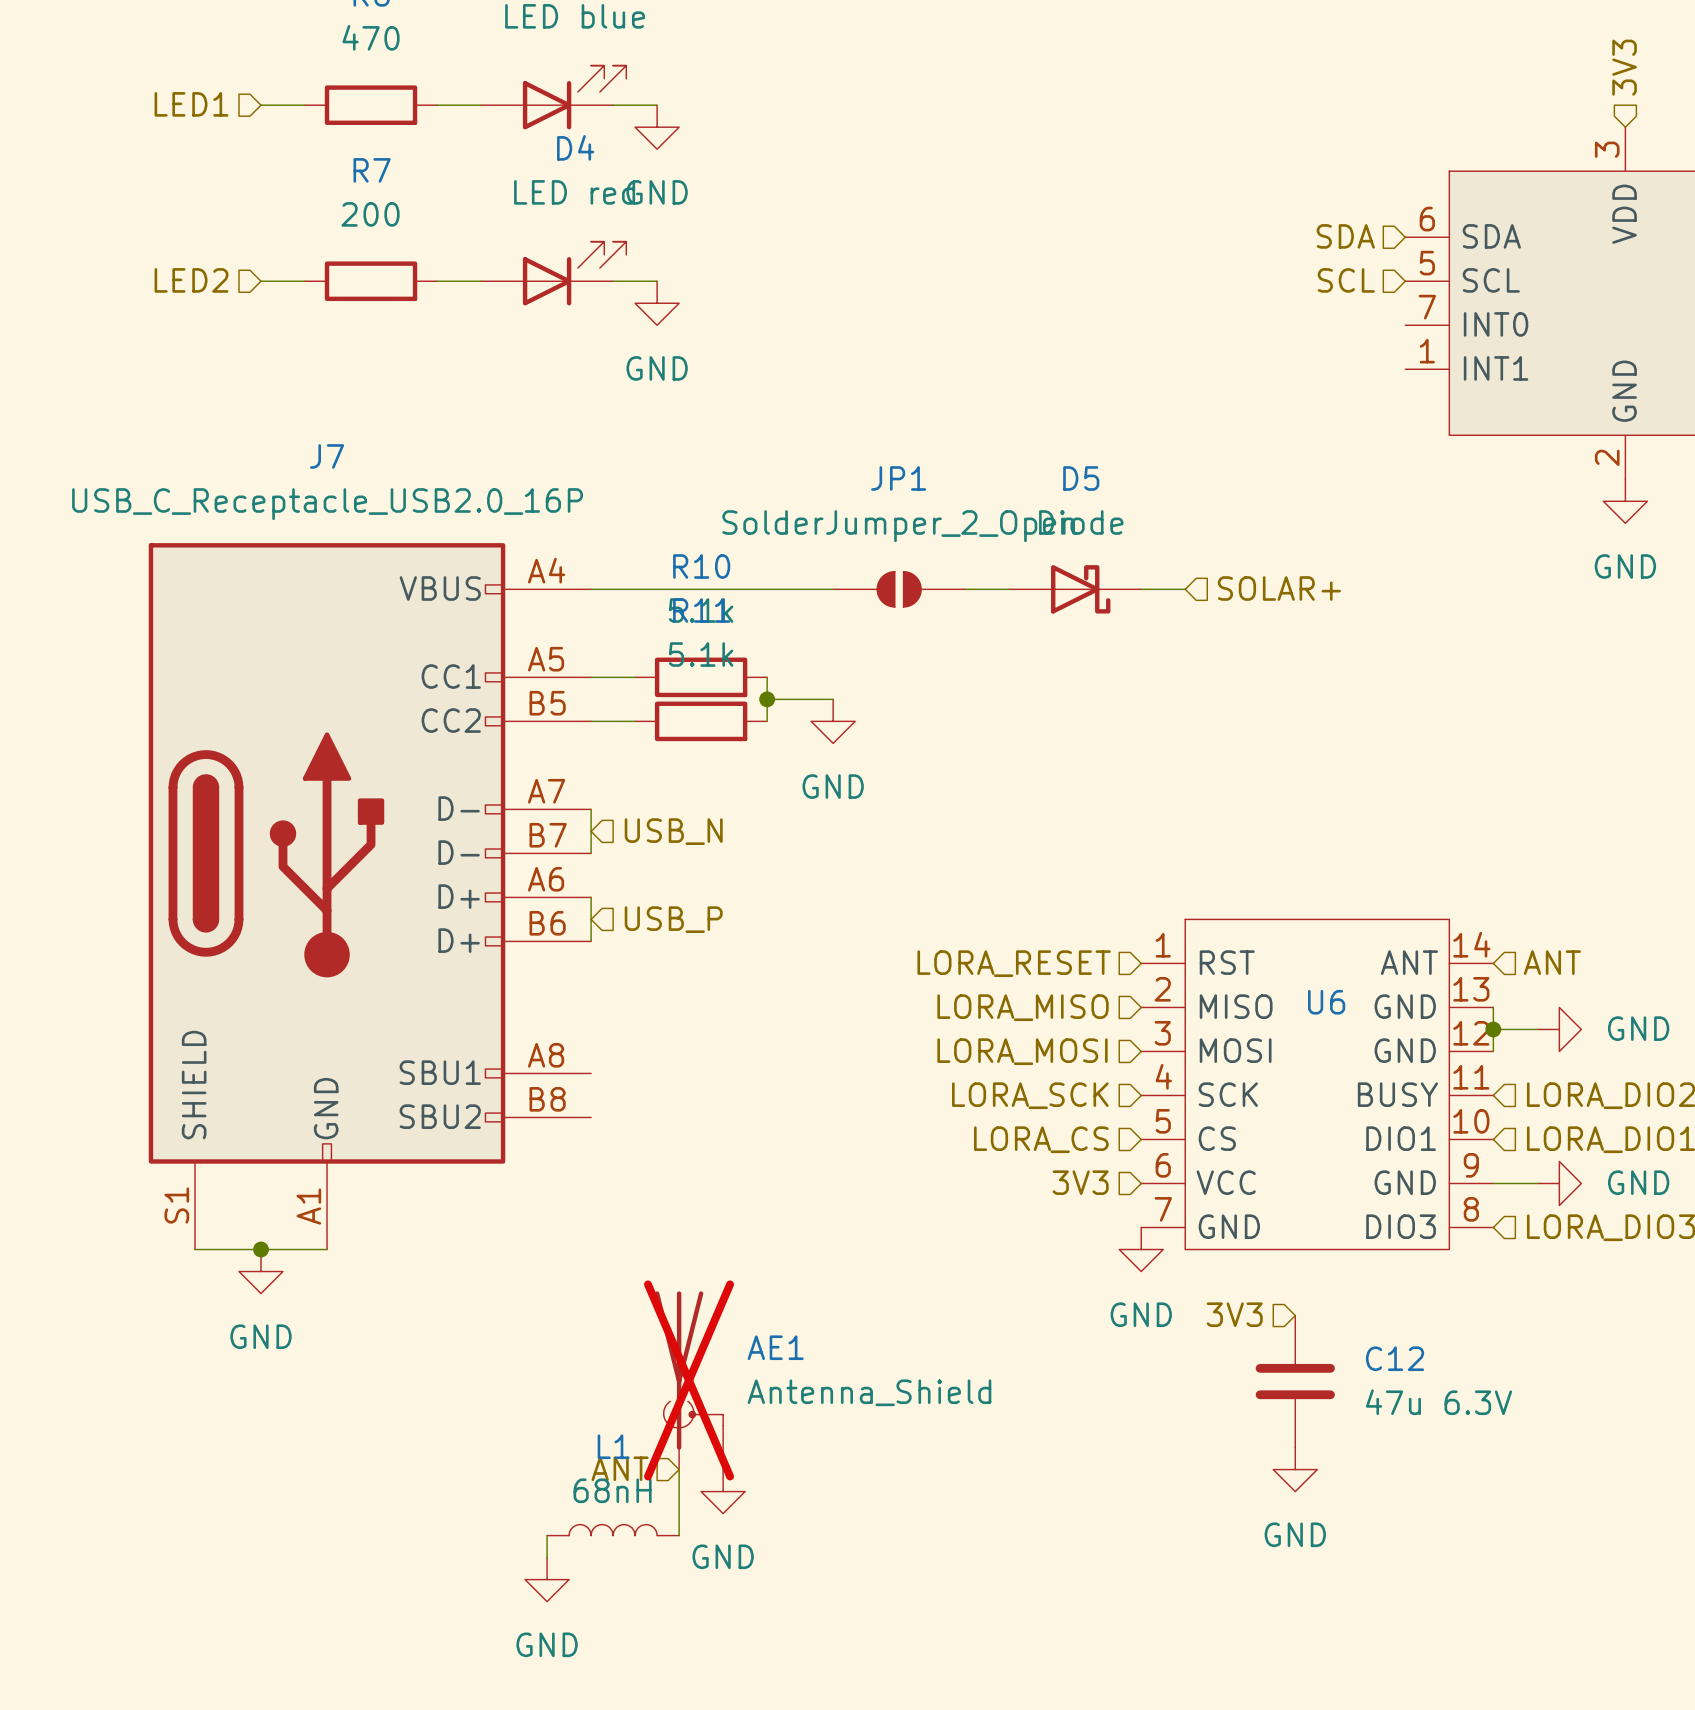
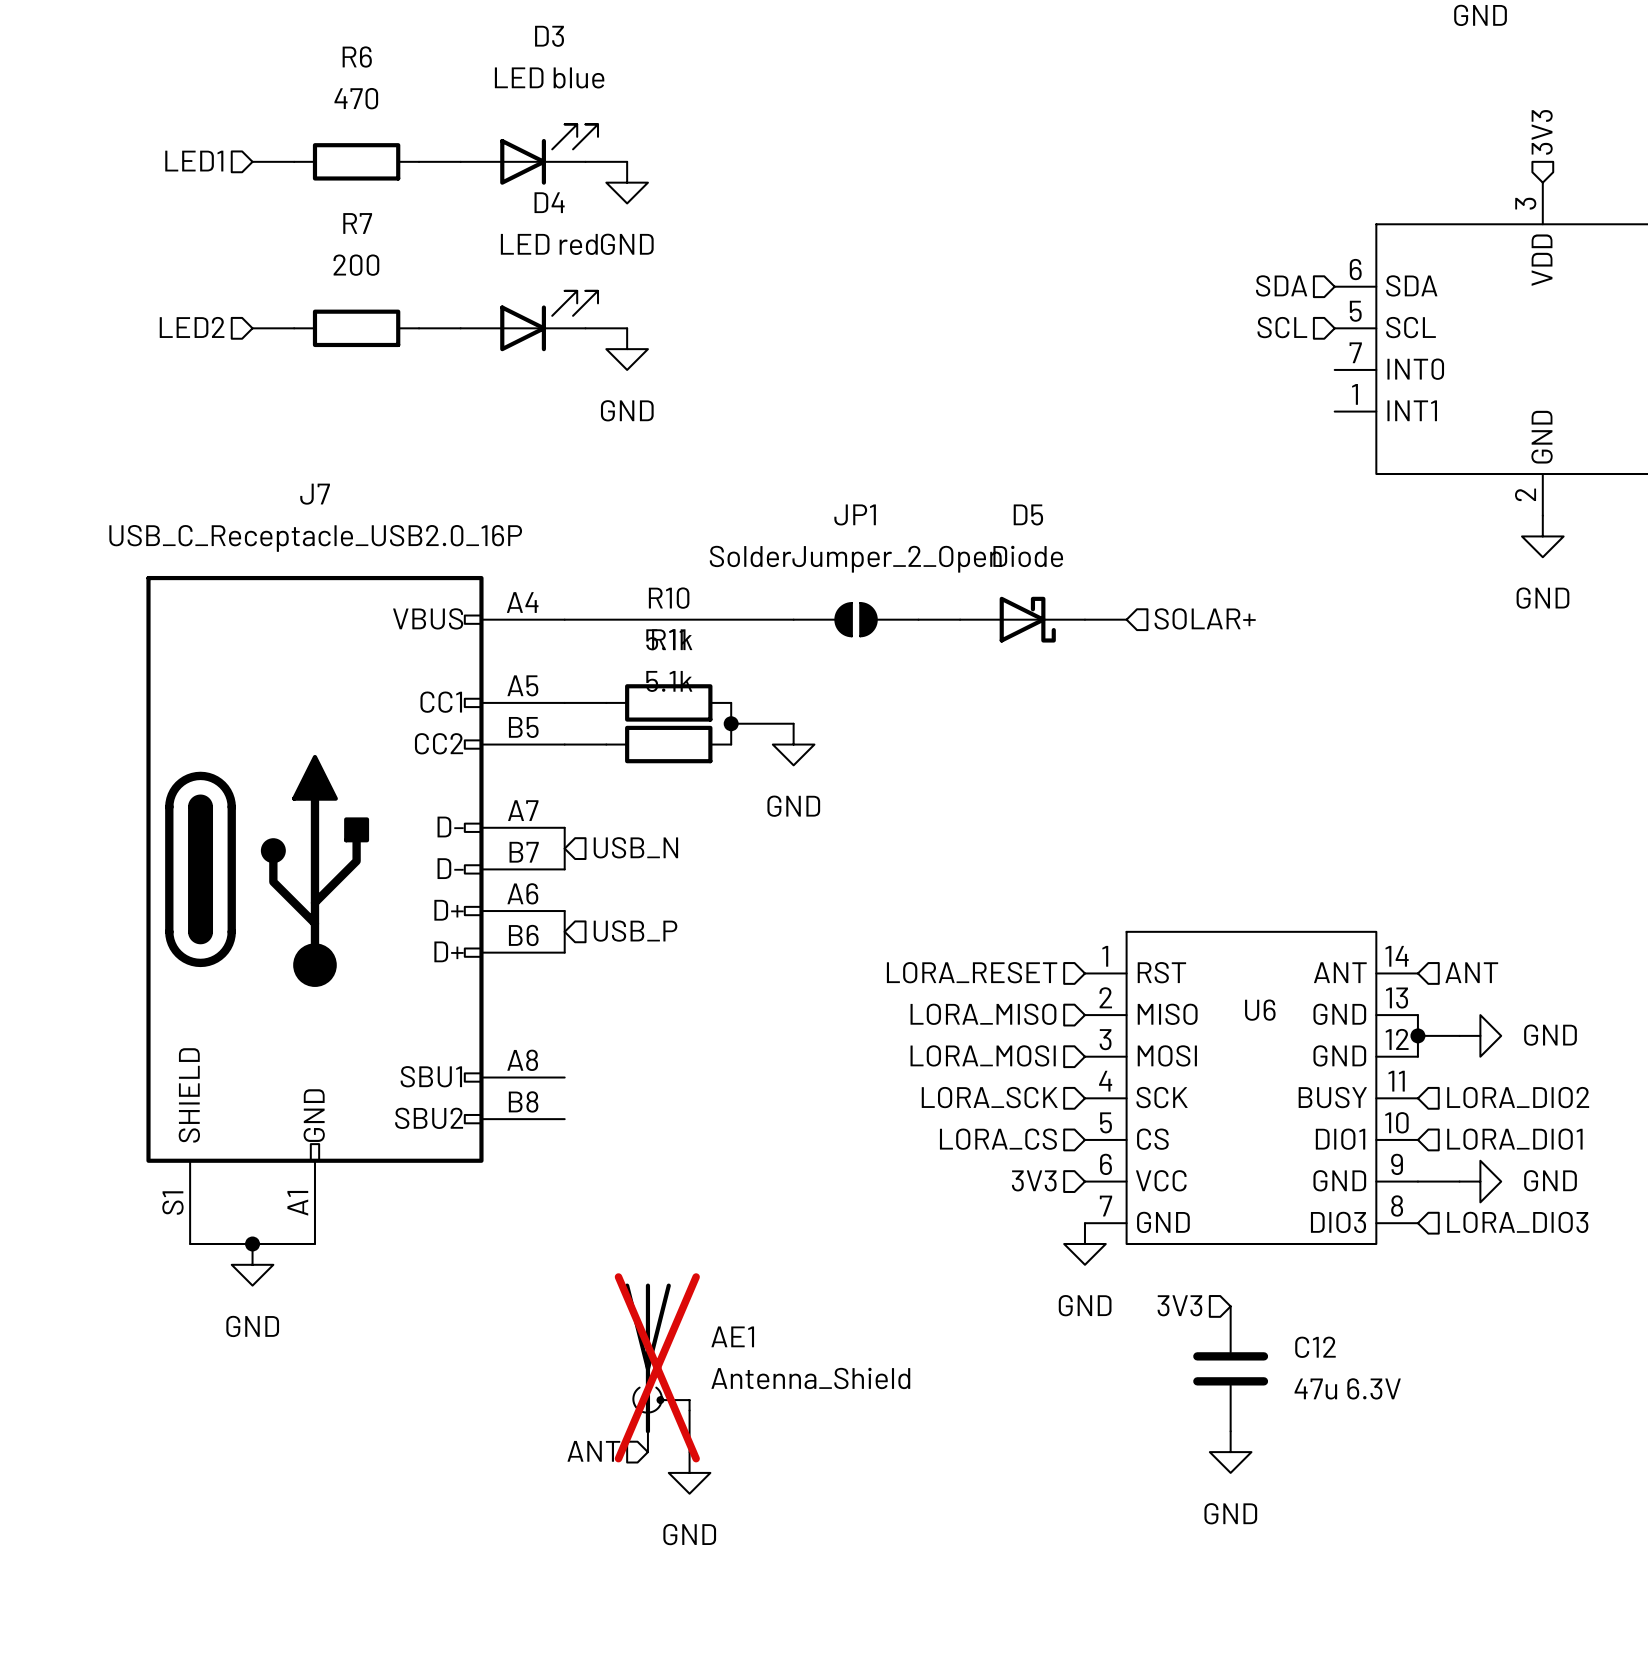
wire: (679, 1469) (679, 1535) -> none
L1: 68nH (613, 1530) -> none
wire: (547, 1535) (547, 1557) -> none
power symbol: GND (547, 1579) -> none

